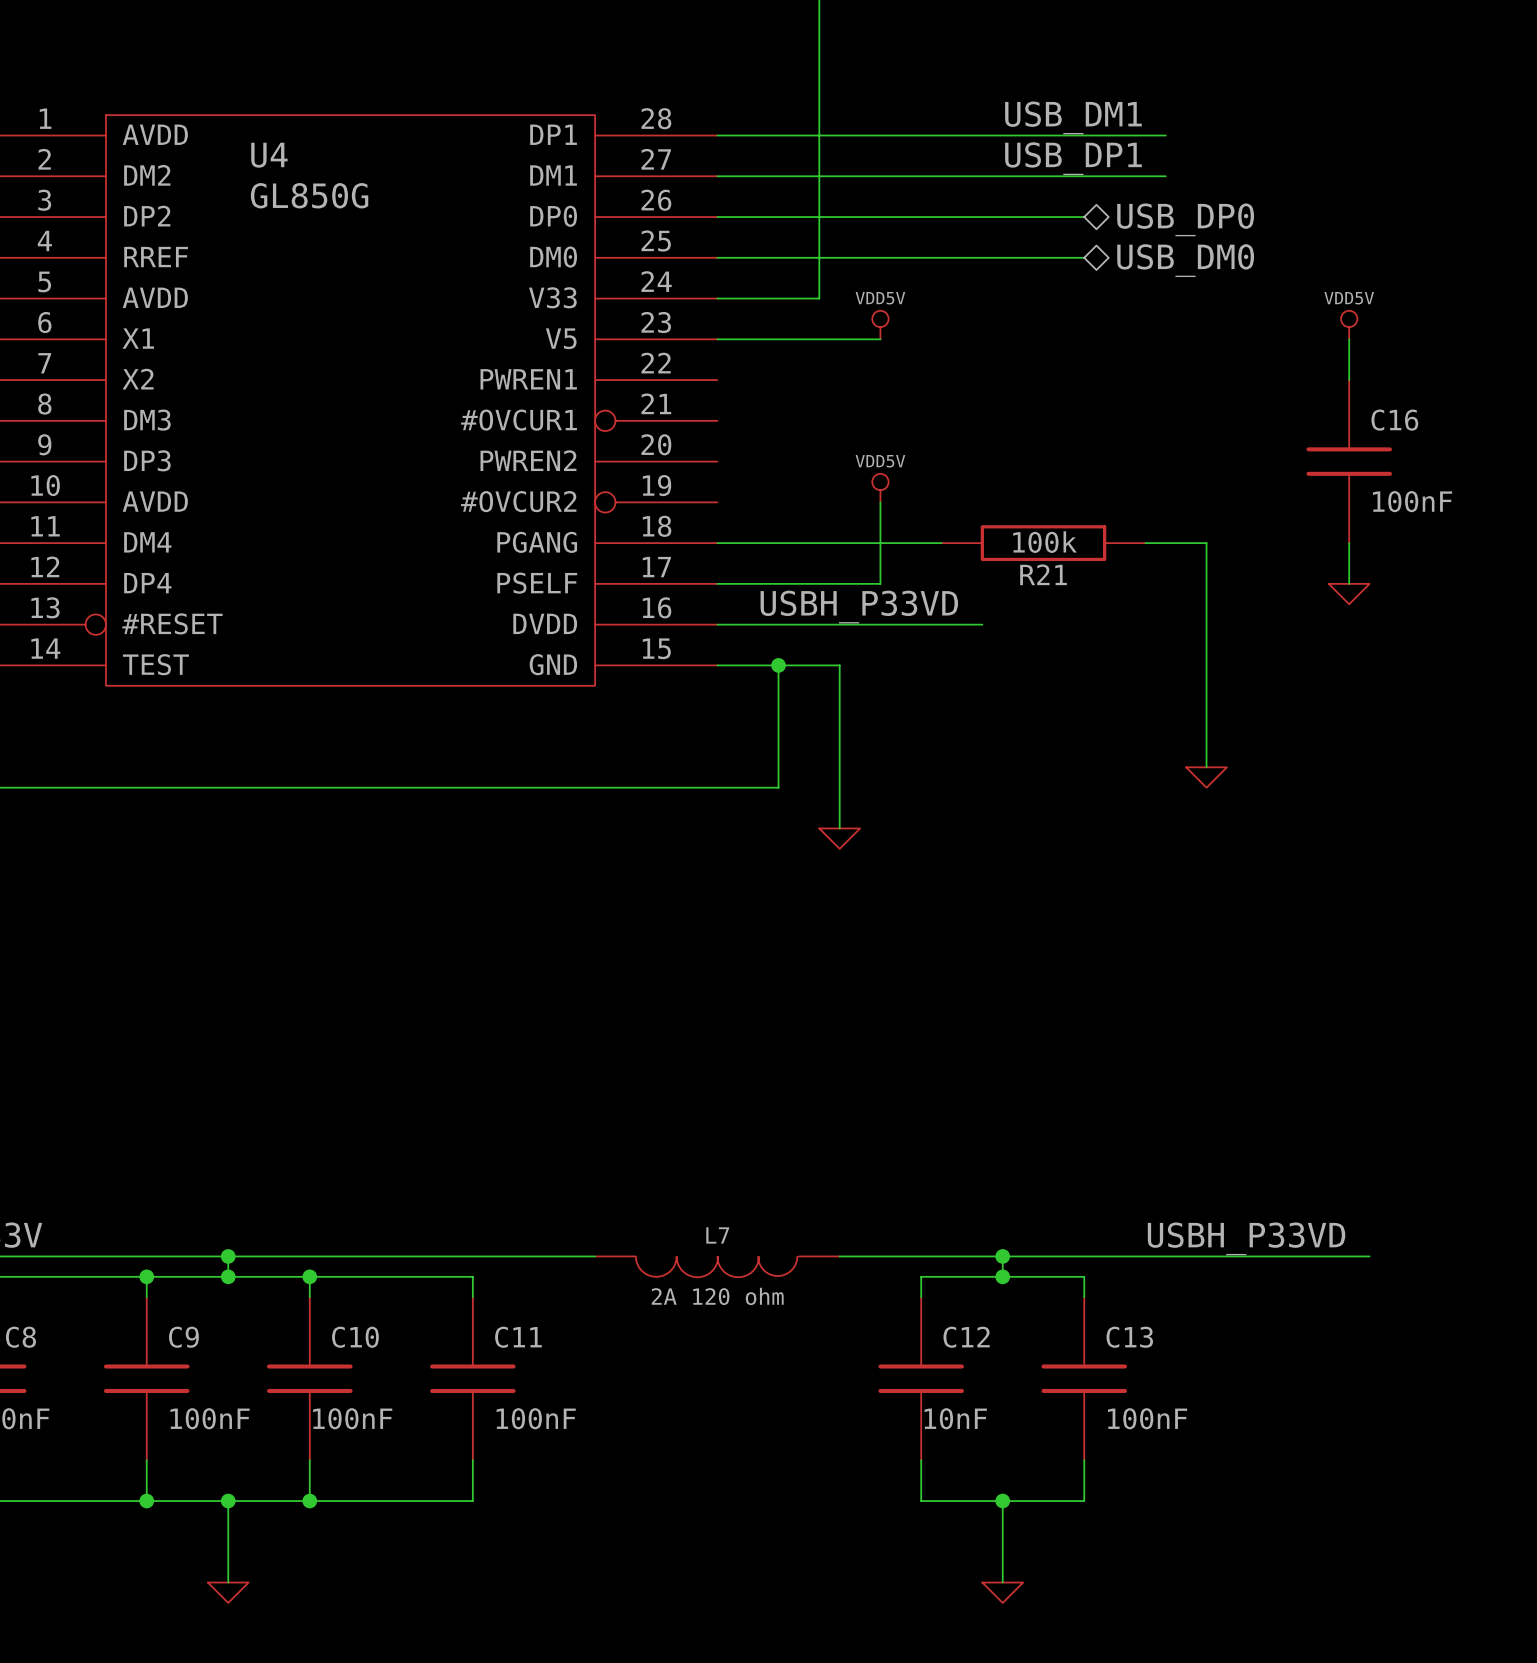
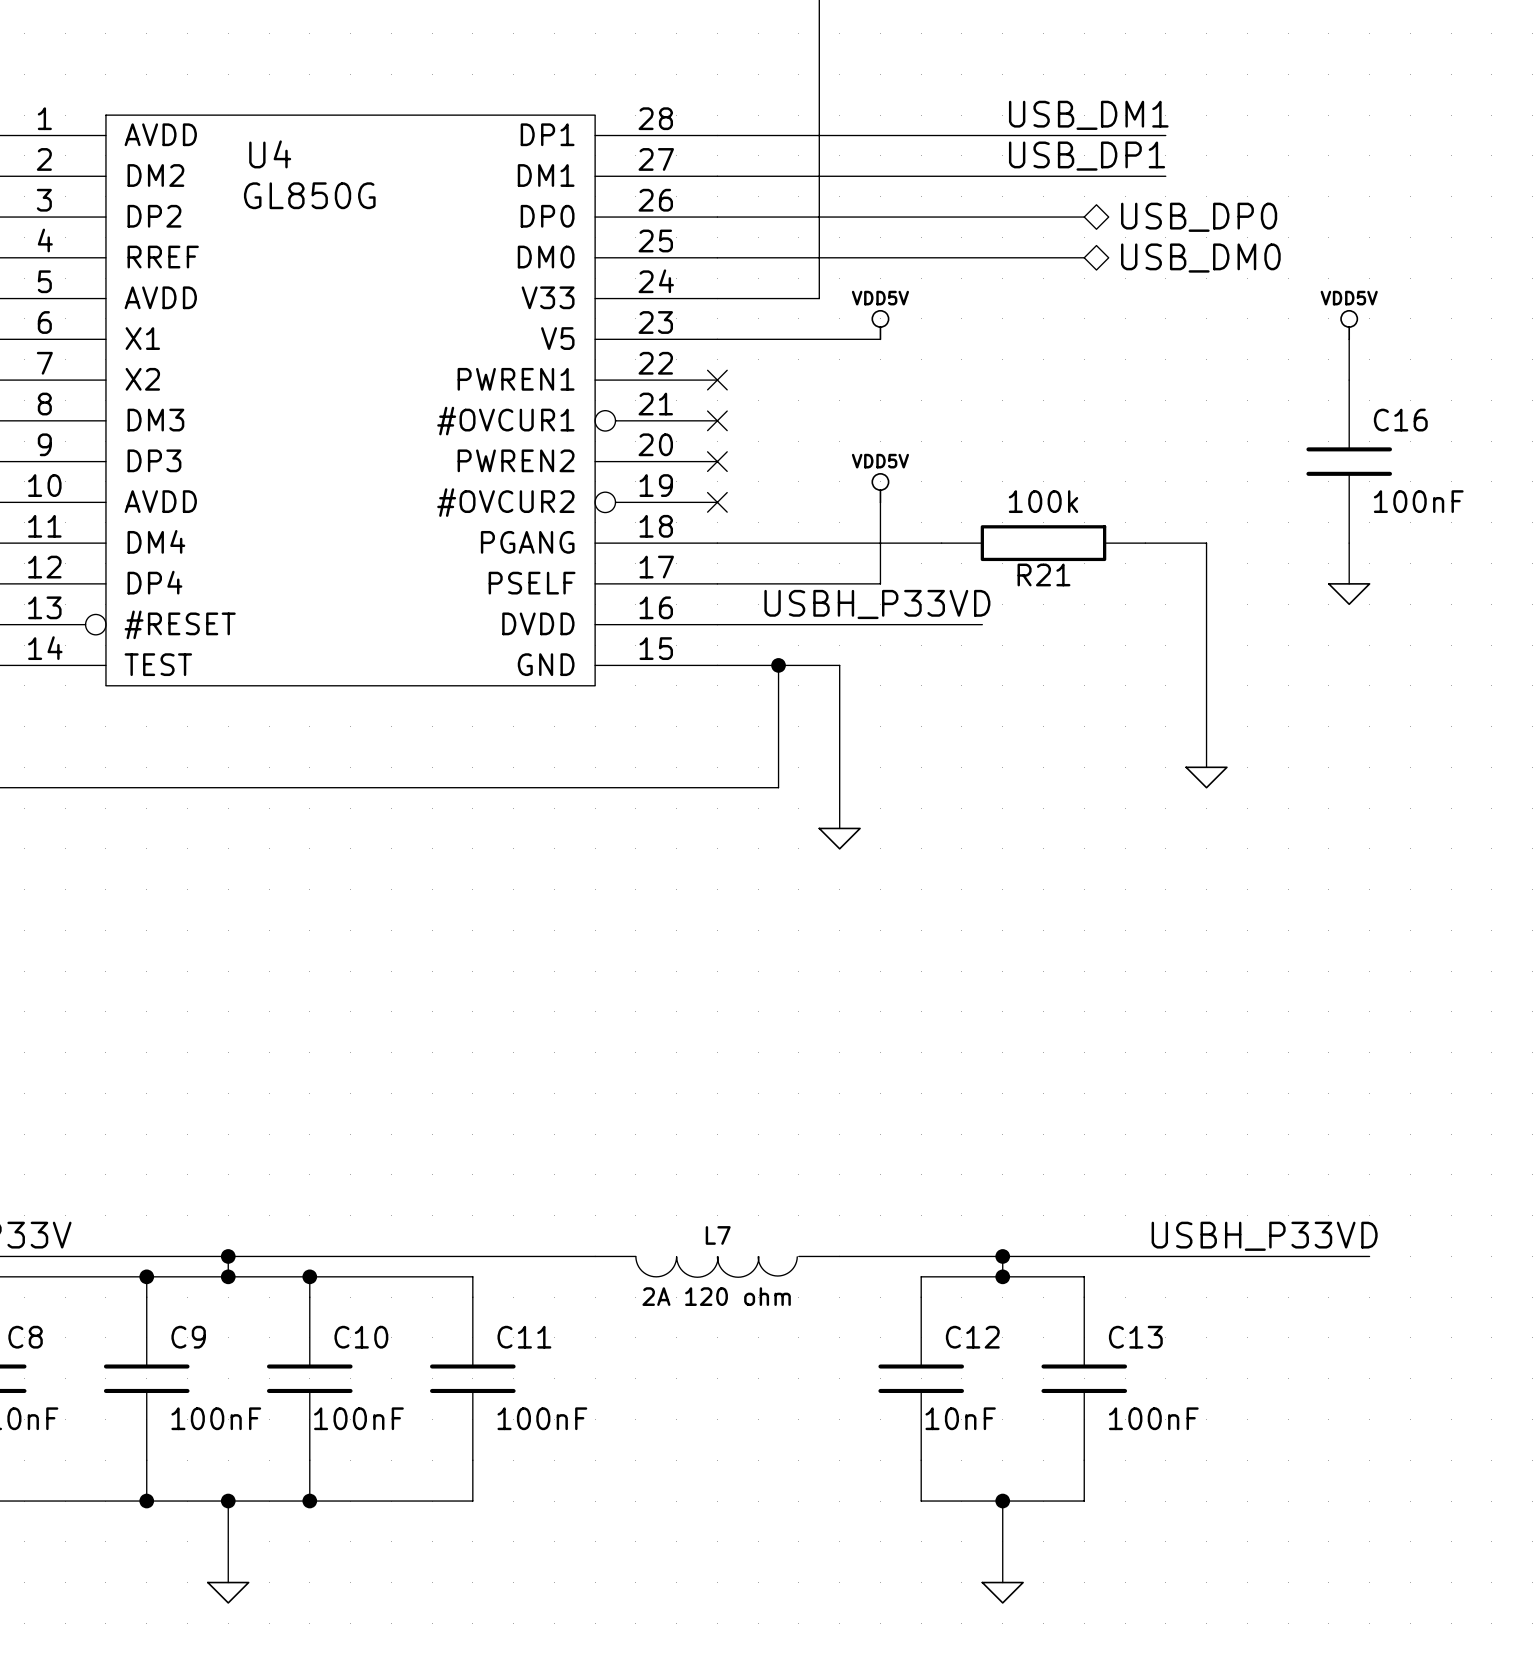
no-connect mark: none -> (717, 380)
no-connect mark: none -> (717, 420)
no-connect mark: none -> (717, 461)
no-connect mark: none -> (717, 502)
R21 value position: 100k (1044, 542) -> 100k (1043, 501)

